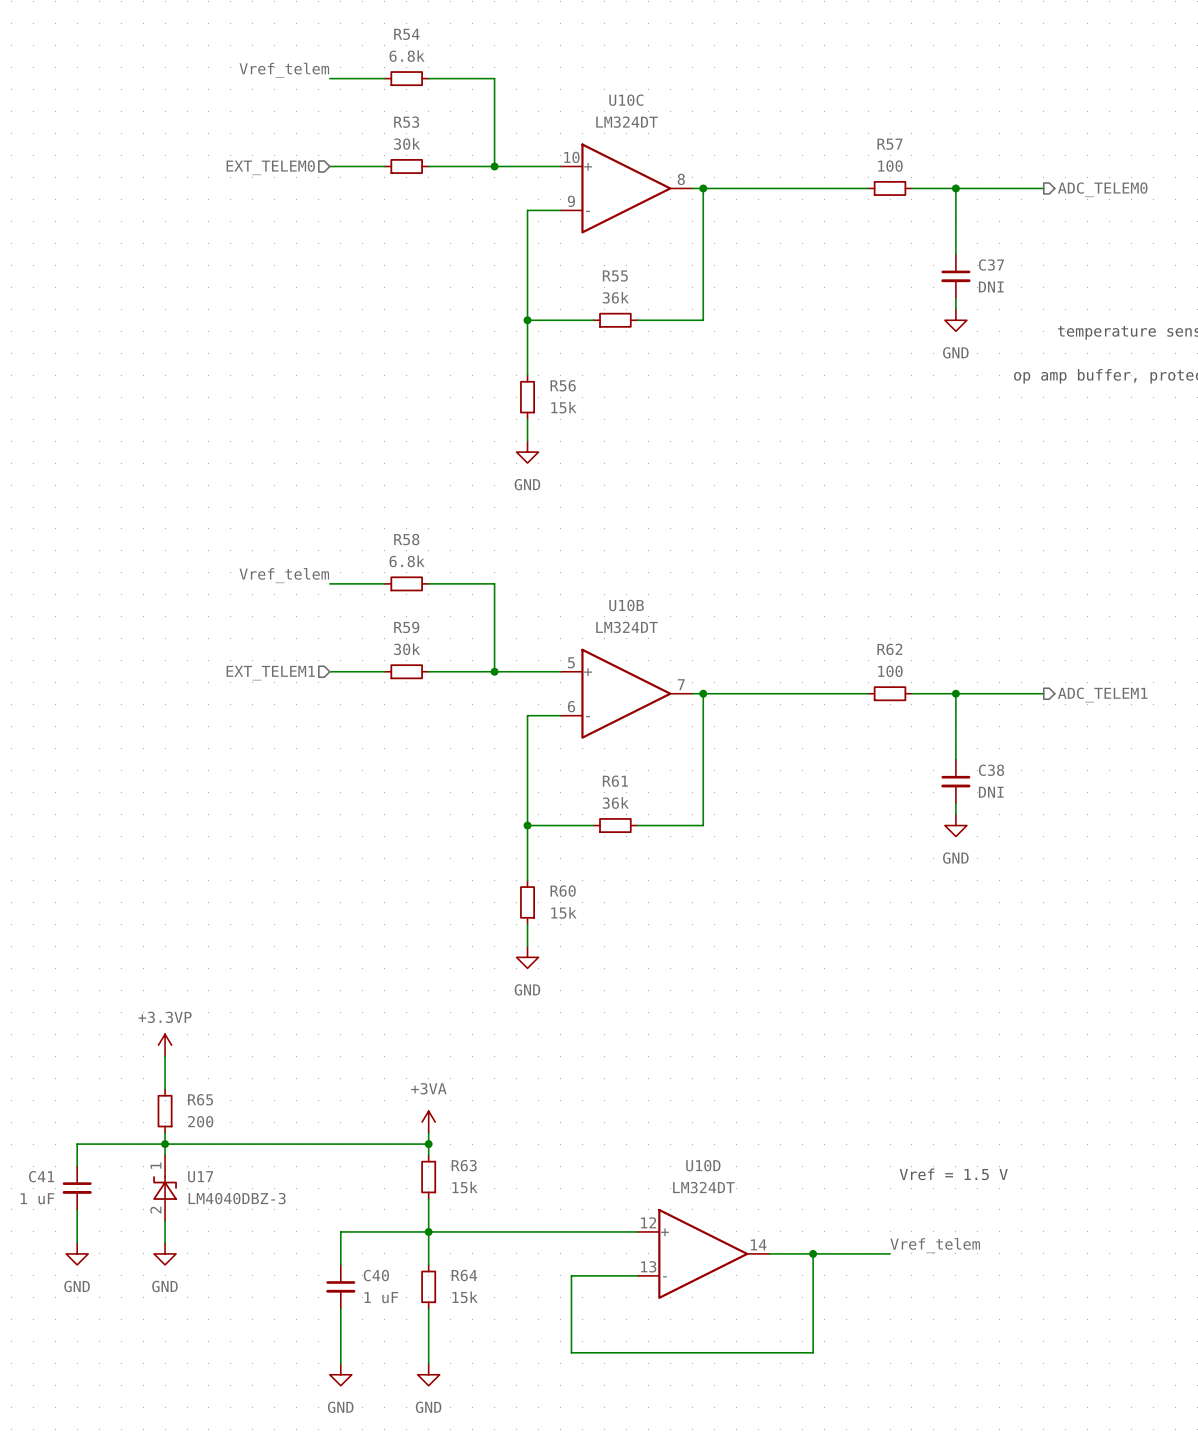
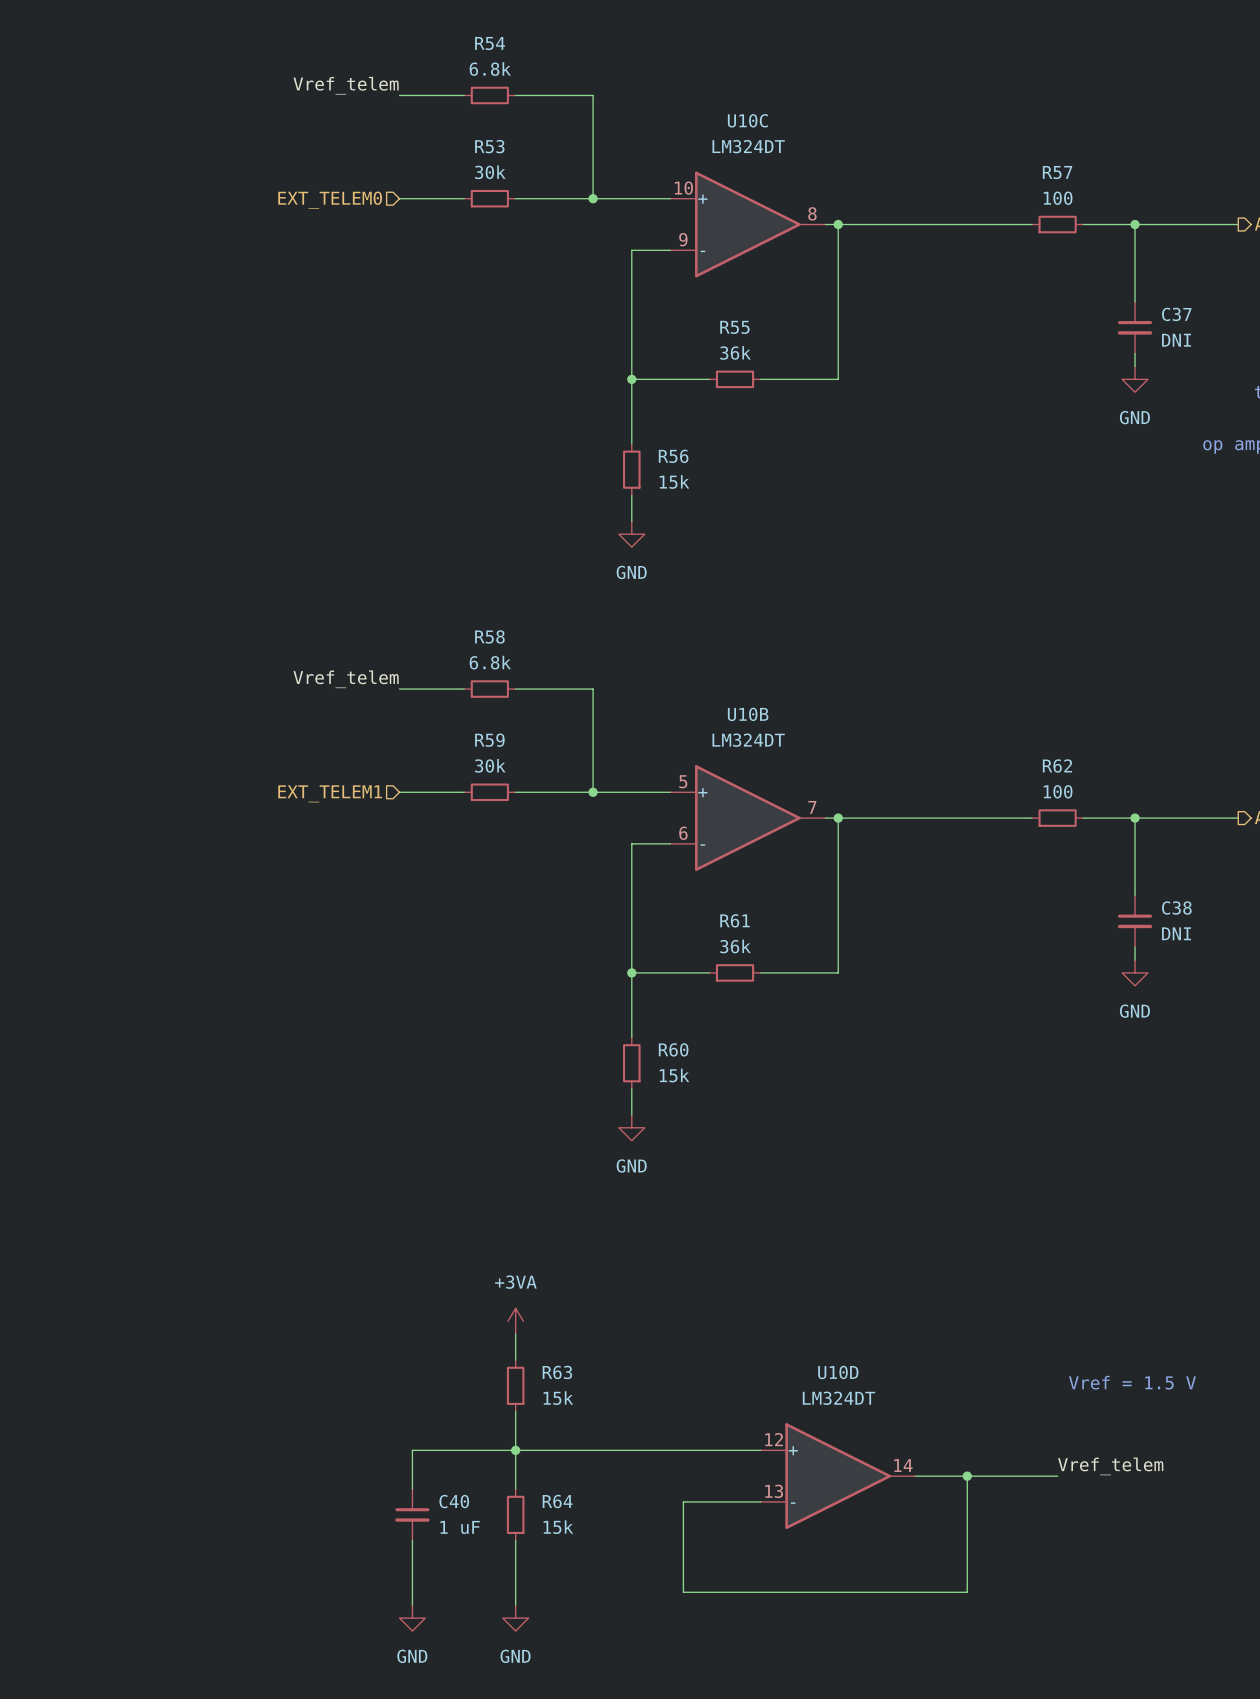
power symbol: +3.3VP (165, 1045) -> none
wire: (165, 1056) (165, 1089) -> none
R65: 200 (165, 1111) -> none
wire: (165, 1133) (165, 1155) -> none
junction: (165, 1144) -> none
wire: (428, 1144) (77, 1144) (77, 1166) -> none
junction: (428, 1144) -> none
C41: 1 uF (77, 1188) -> none
U17: LM4040DBZ-3 (165, 1188) -> none
wire: (77, 1209) (77, 1242) -> none
wire: (165, 1220) (165, 1242) -> none
power symbol: GND (77, 1253) -> none
power symbol: GND (165, 1253) -> none

